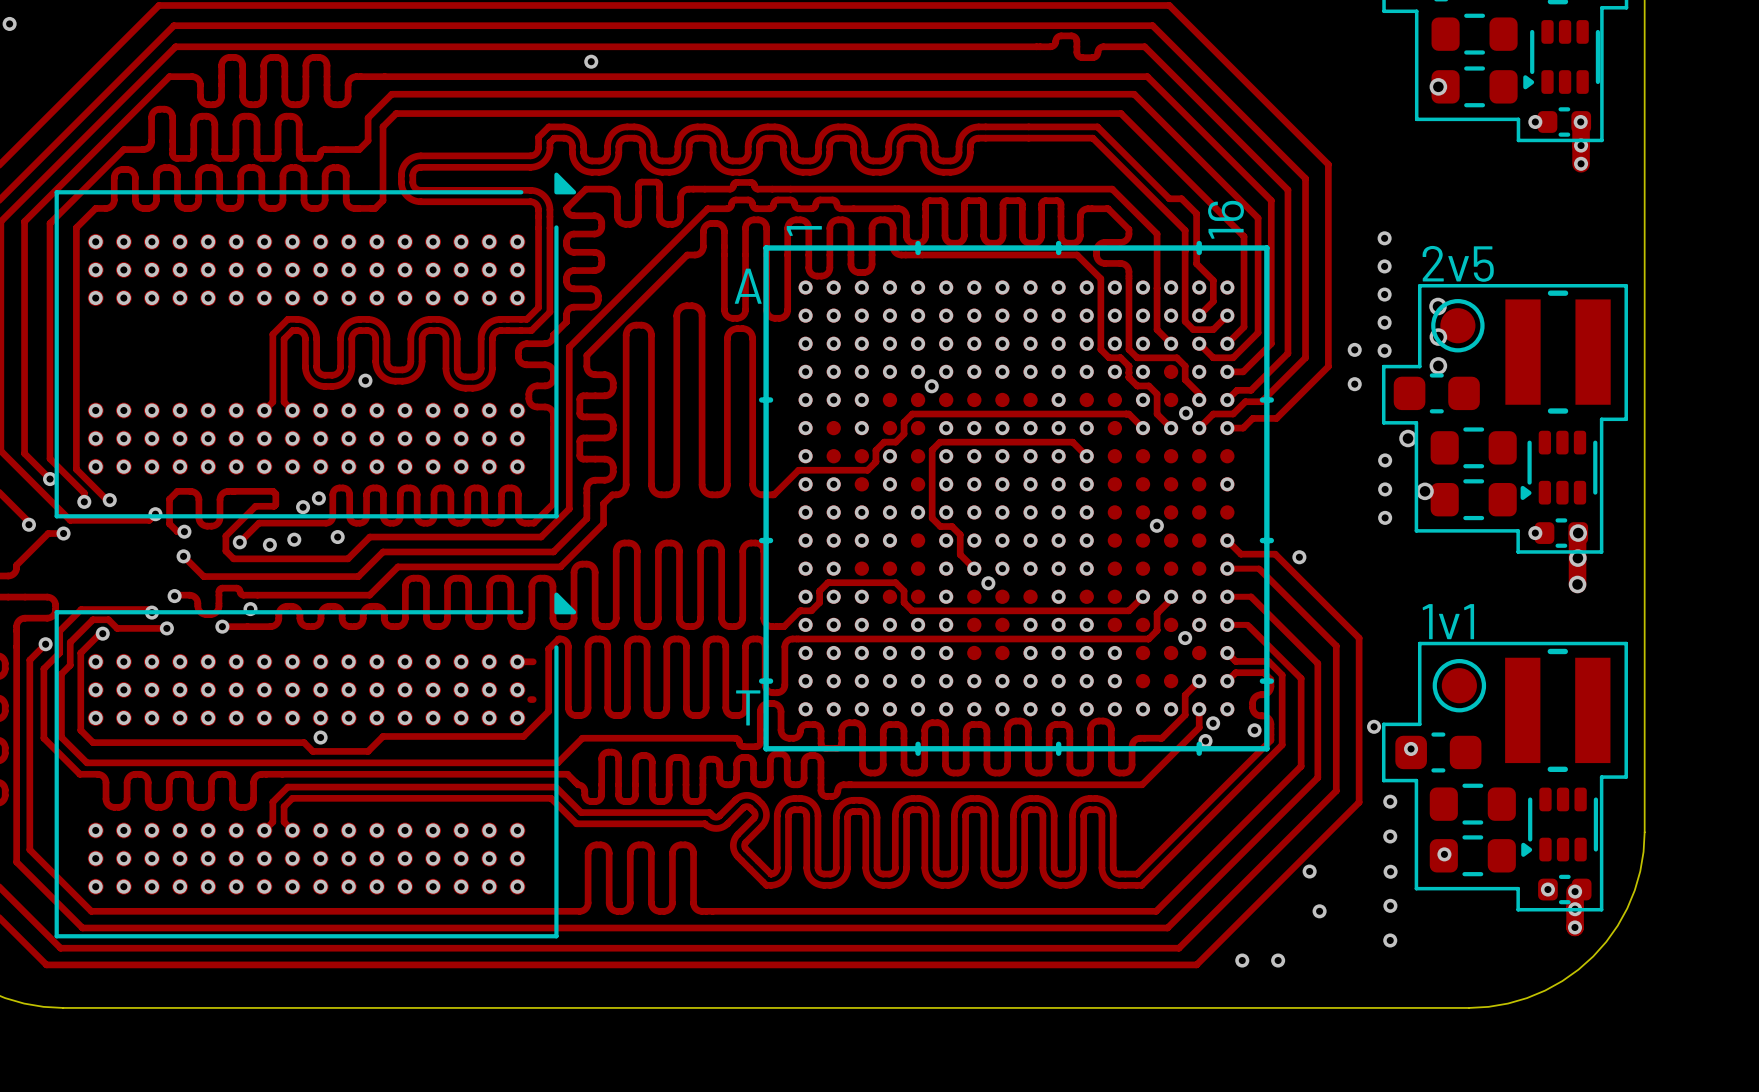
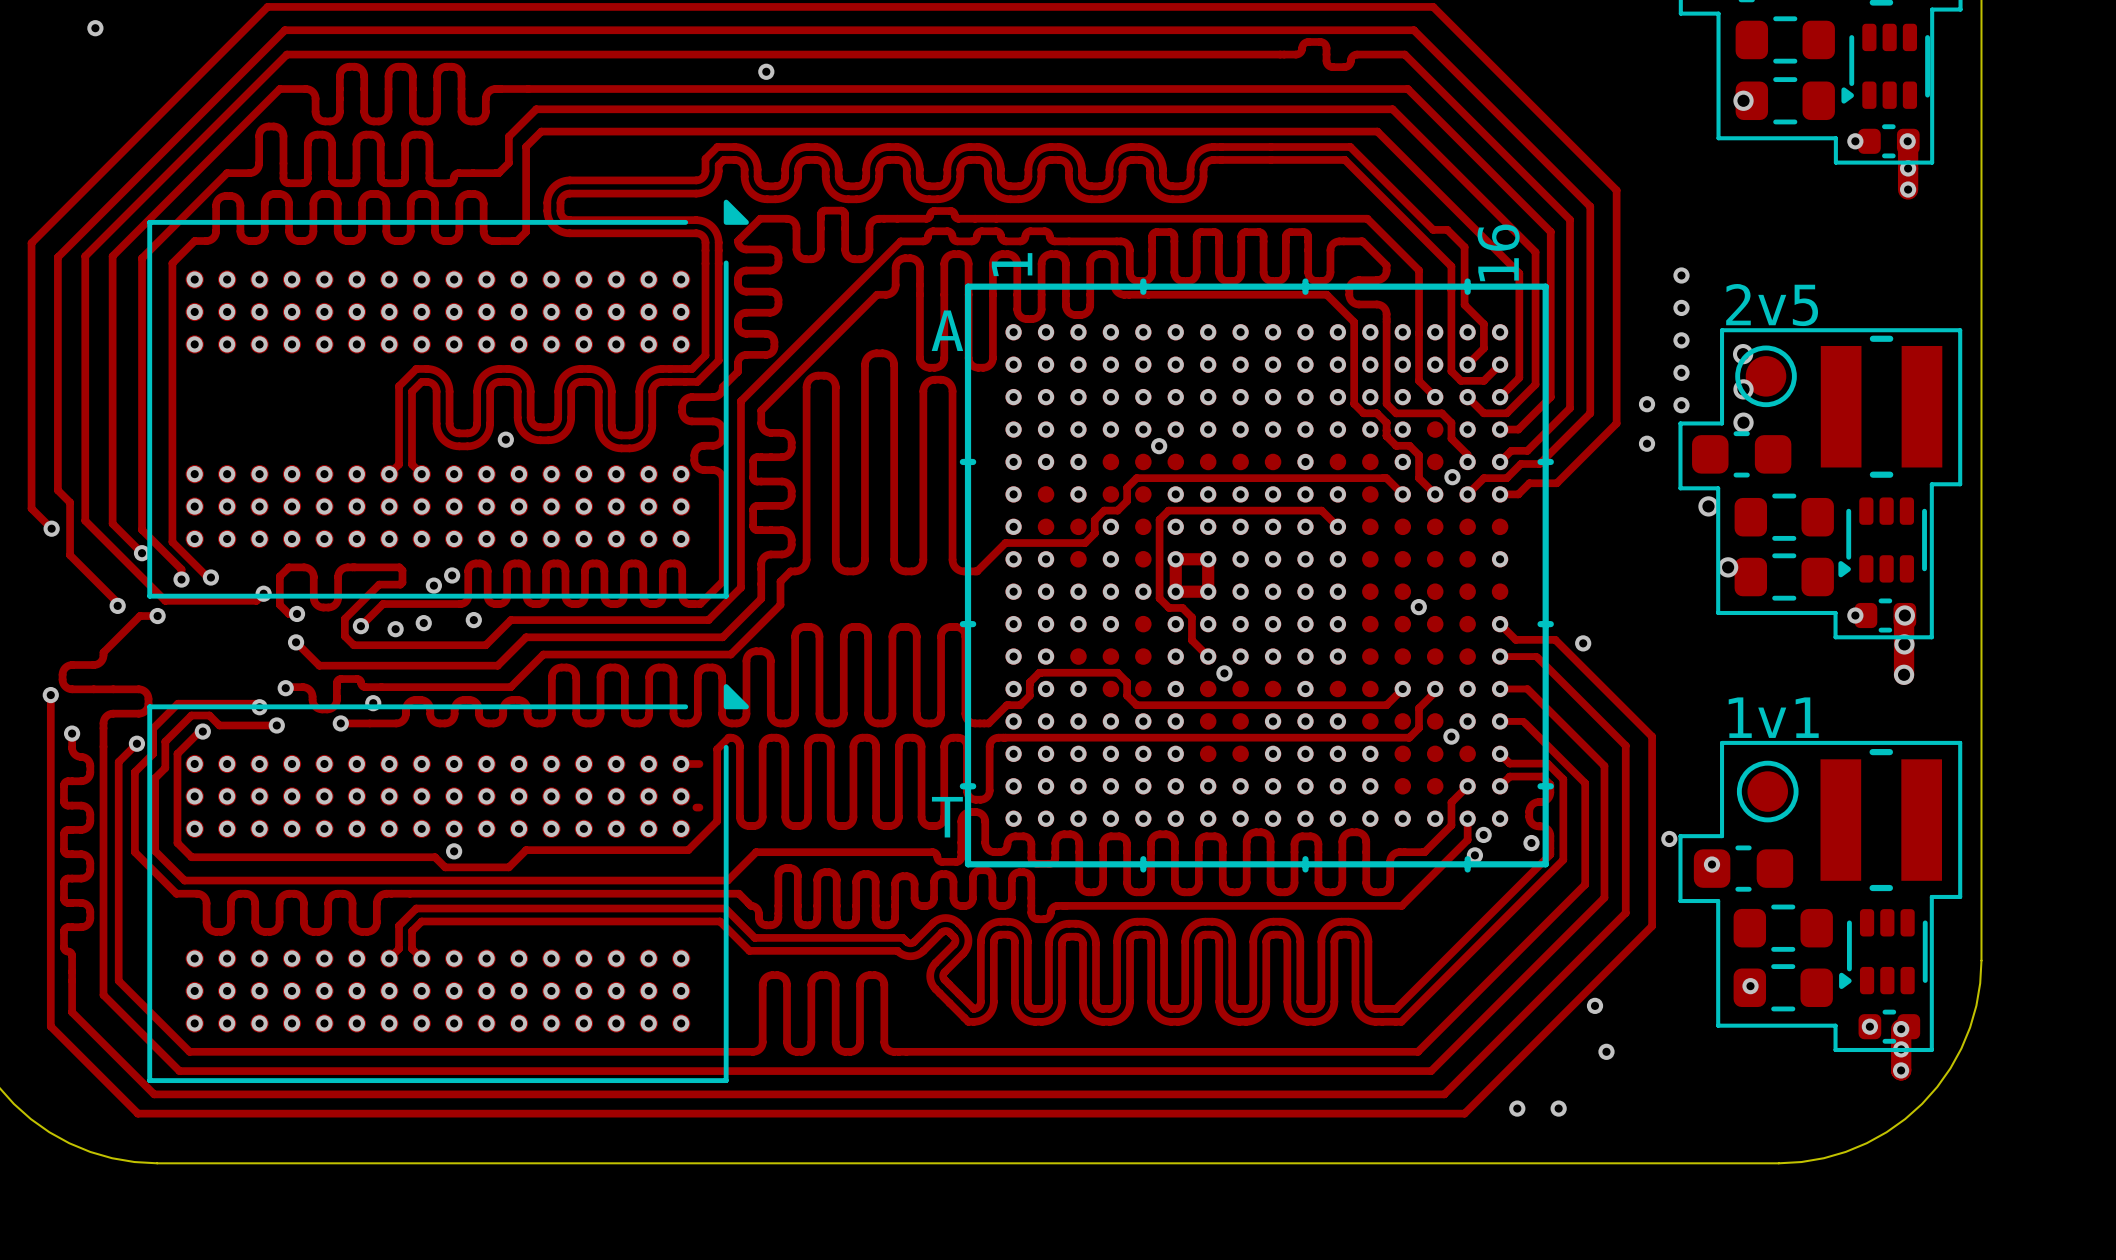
via: (1385, 460) -> none
track: none -> (1175, 559) (1175, 591) (1208, 591) (1208, 559) (1175, 559)
via: (1385, 489) -> none
via: (1385, 517) -> none
via: (1390, 801) -> none
via: (1390, 836) -> none
via: (1390, 871) -> none
via: (1390, 905) -> none
via: (1390, 940) -> none

